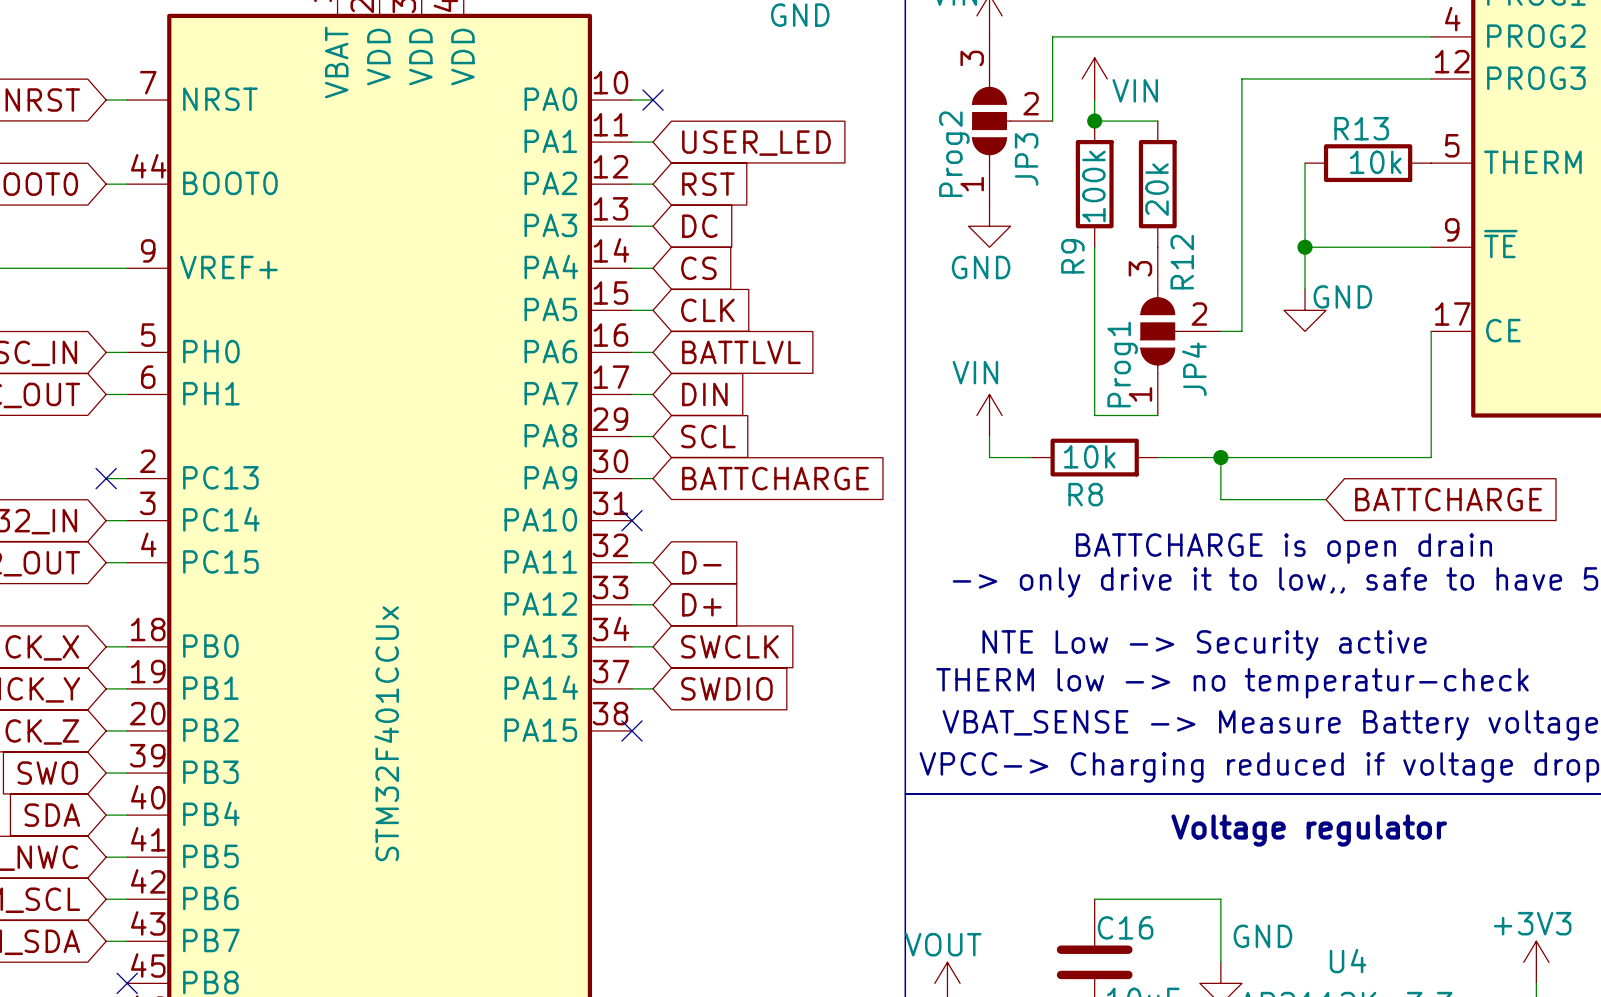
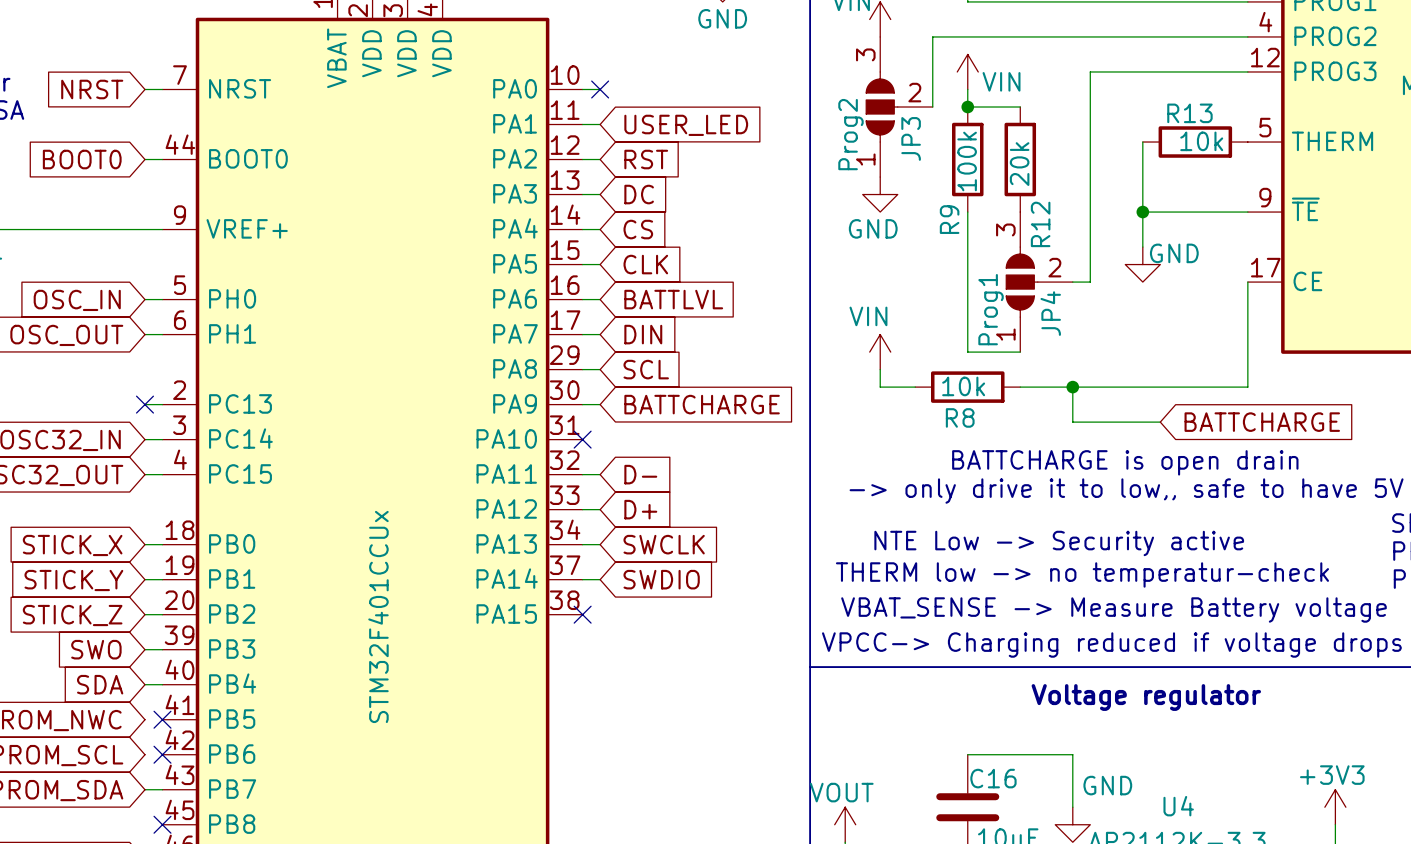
wire: (106, 857) (127, 857) -> none
no-connect mark: none -> (162, 719)
wire: (106, 899) (127, 899) -> none
no-connect mark: none -> (162, 754)

